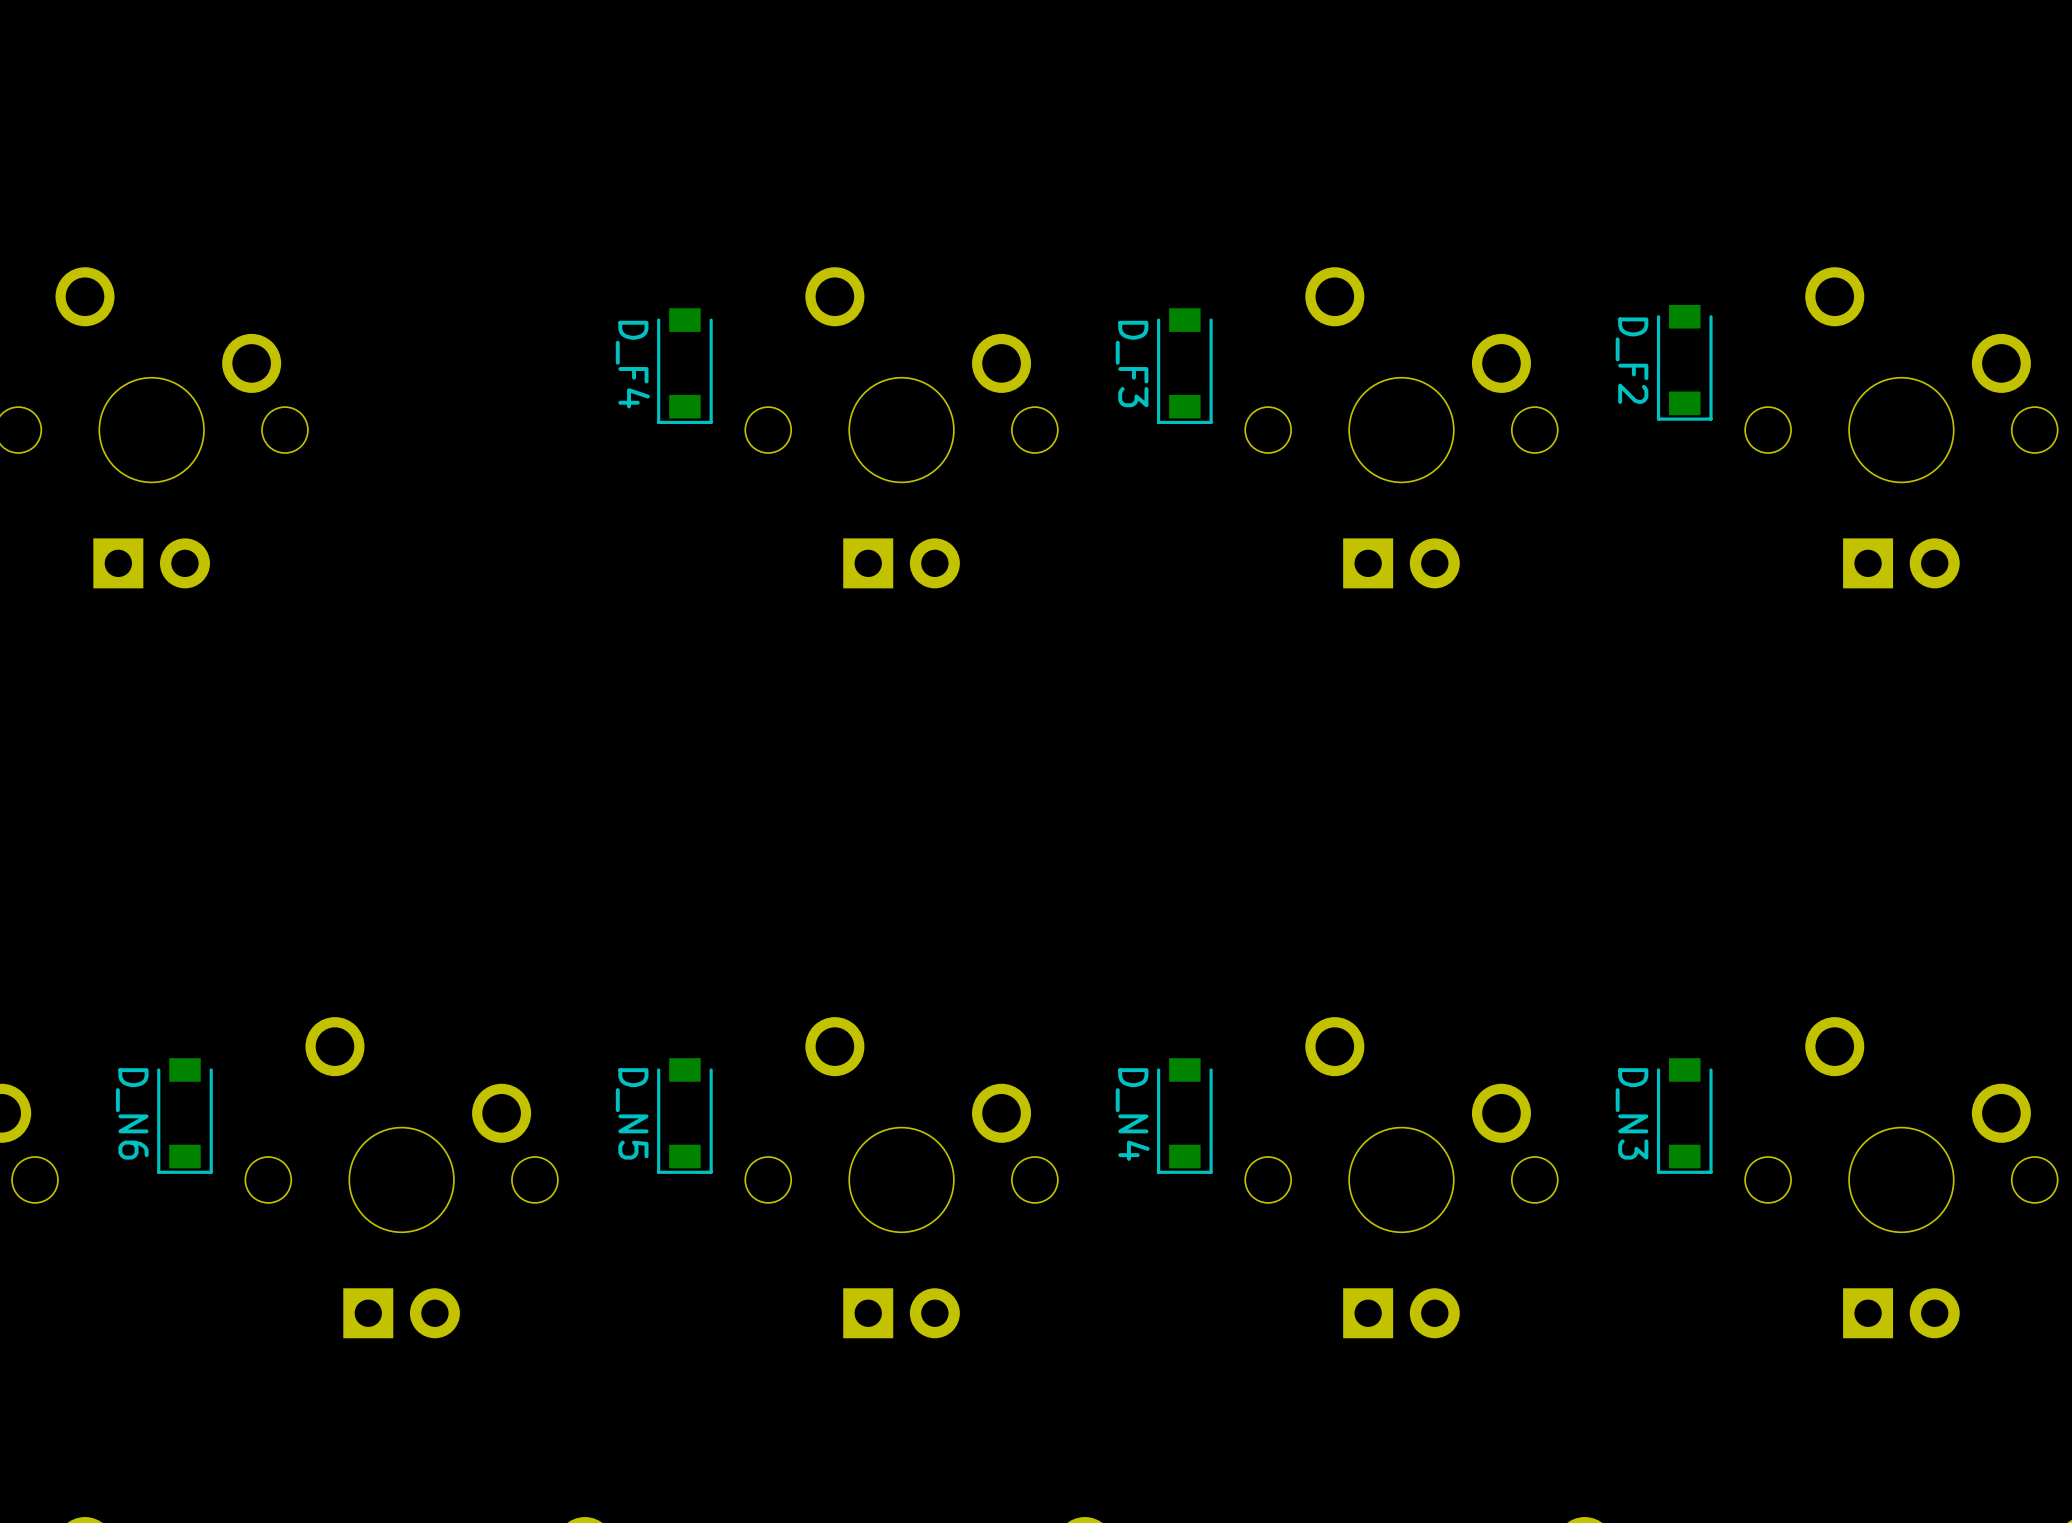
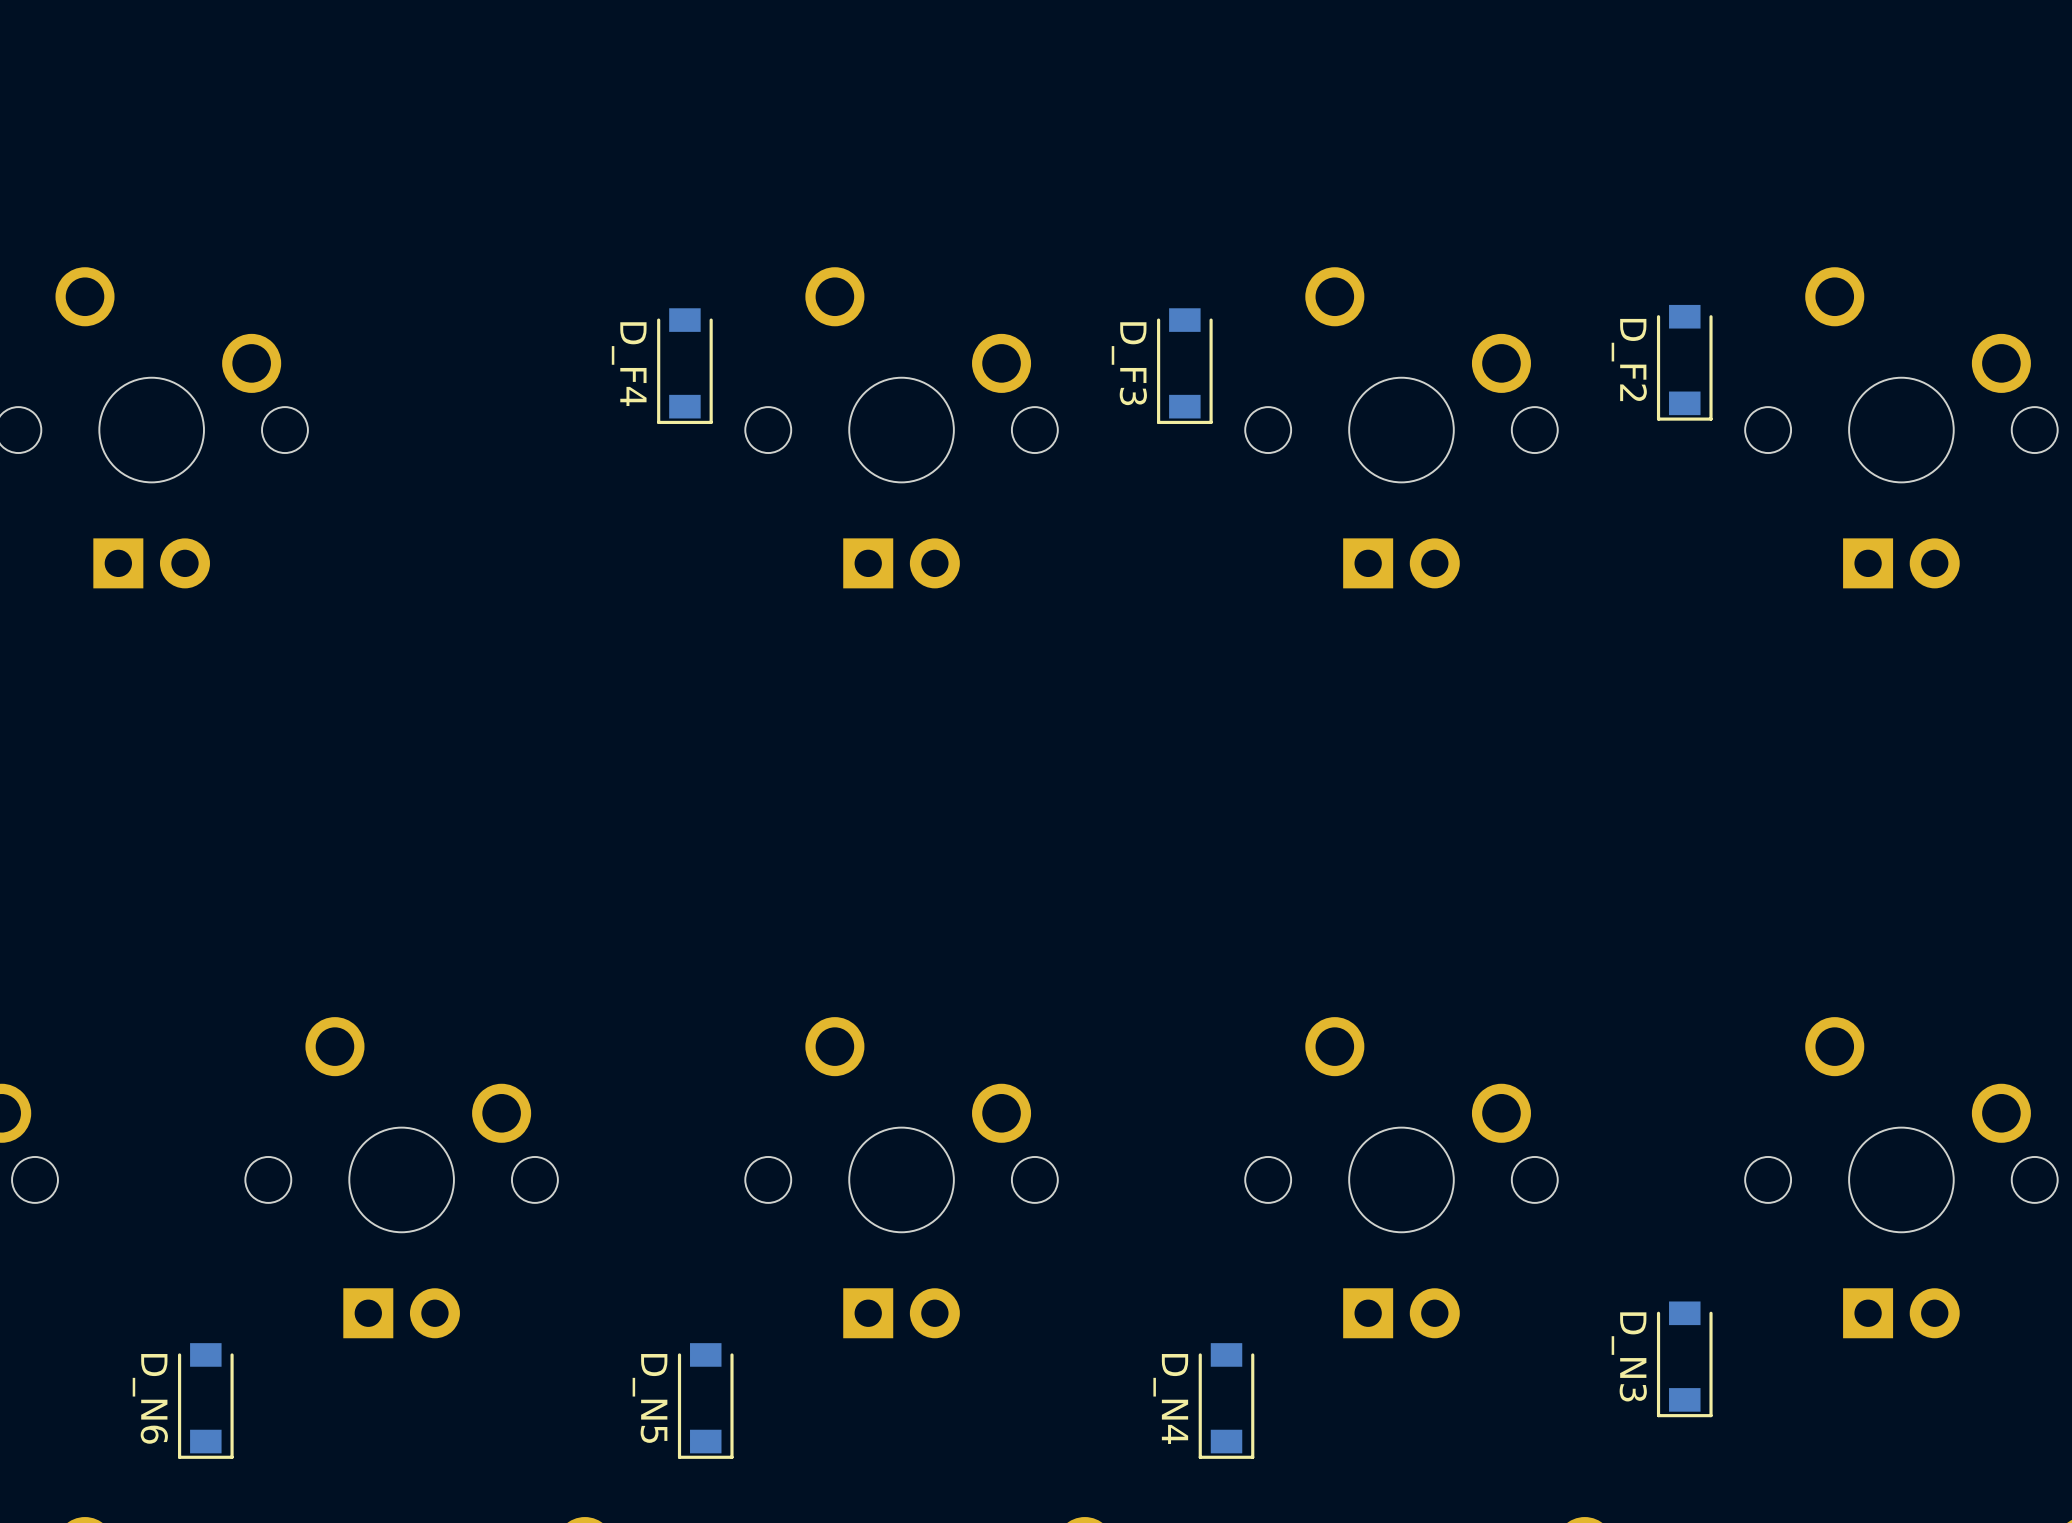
D_N6 position: (184, 1116) -> (205, 1401)
D_N5 position: (684, 1116) -> (705, 1401)
D_N4 position: (1184, 1116) -> (1226, 1401)
D_N3 position: (1684, 1116) -> (1684, 1359)

